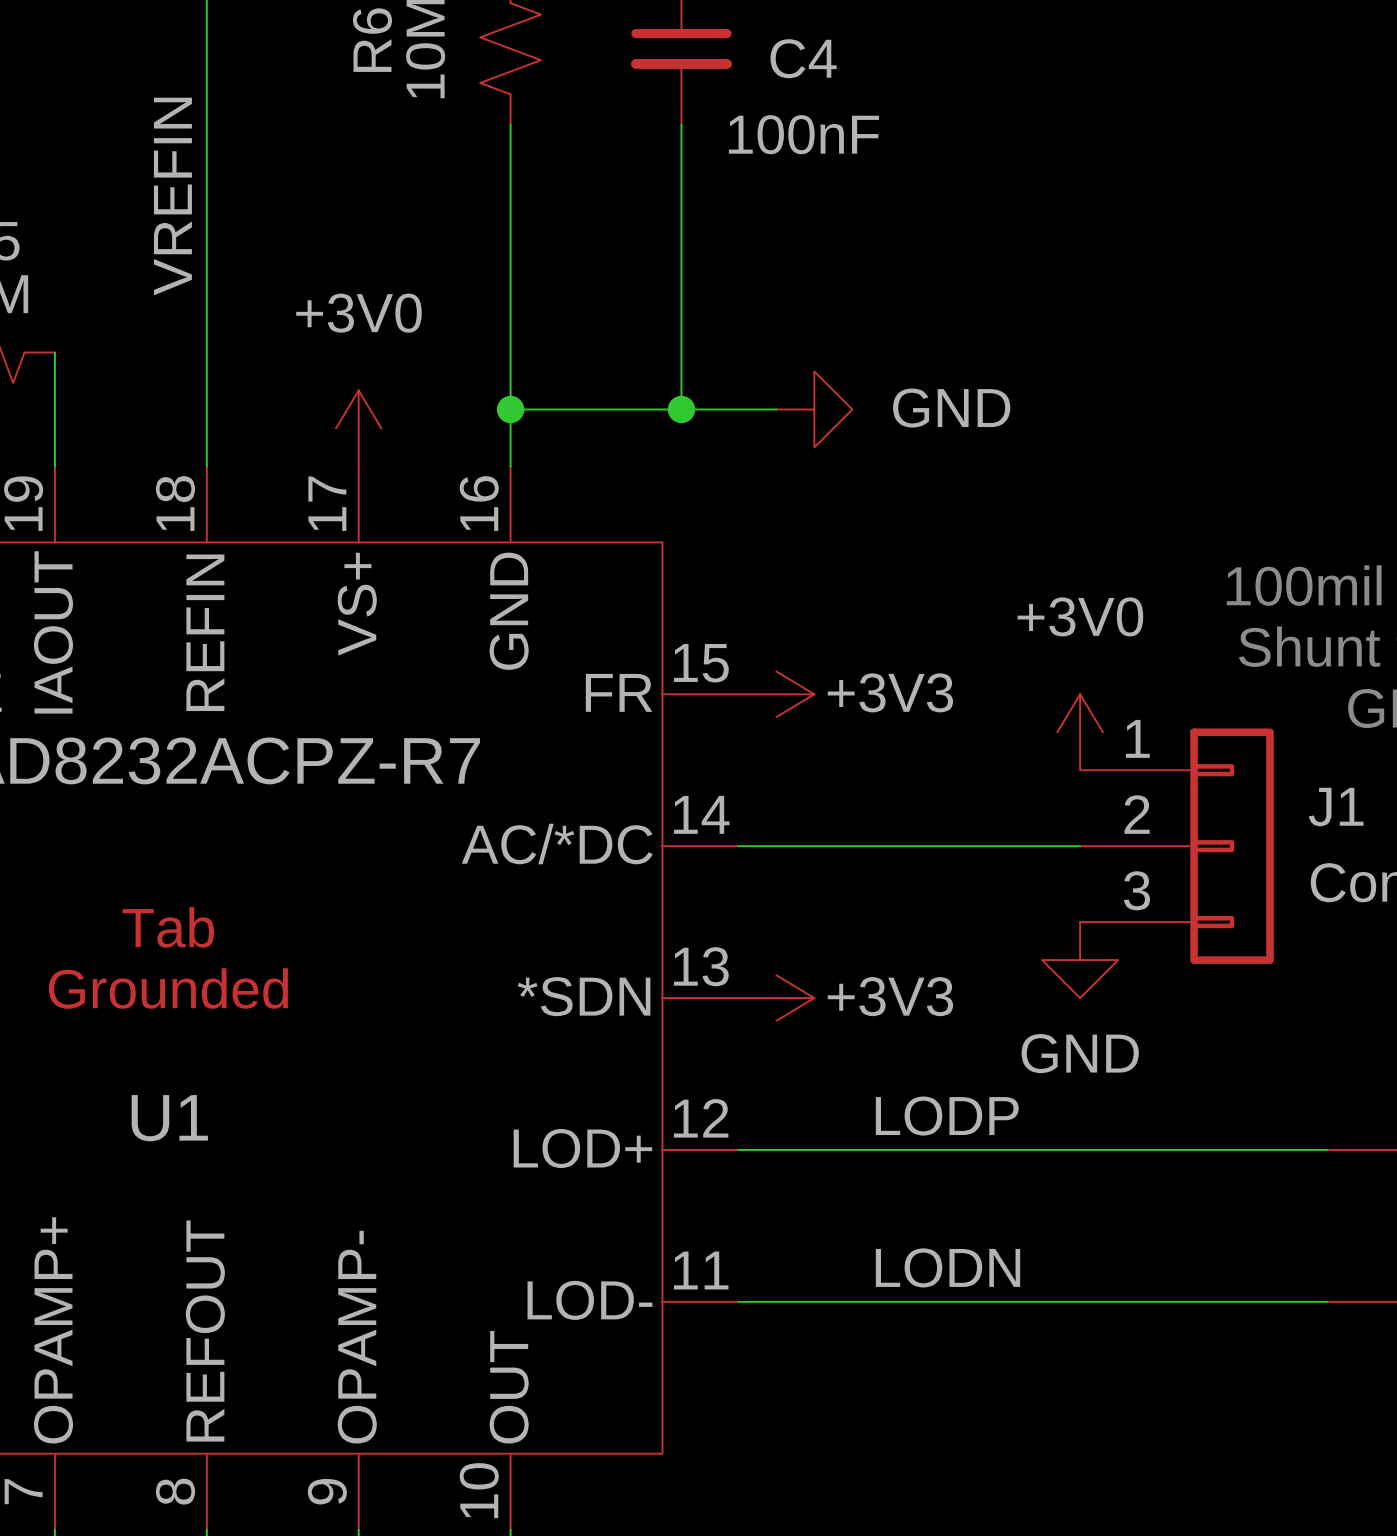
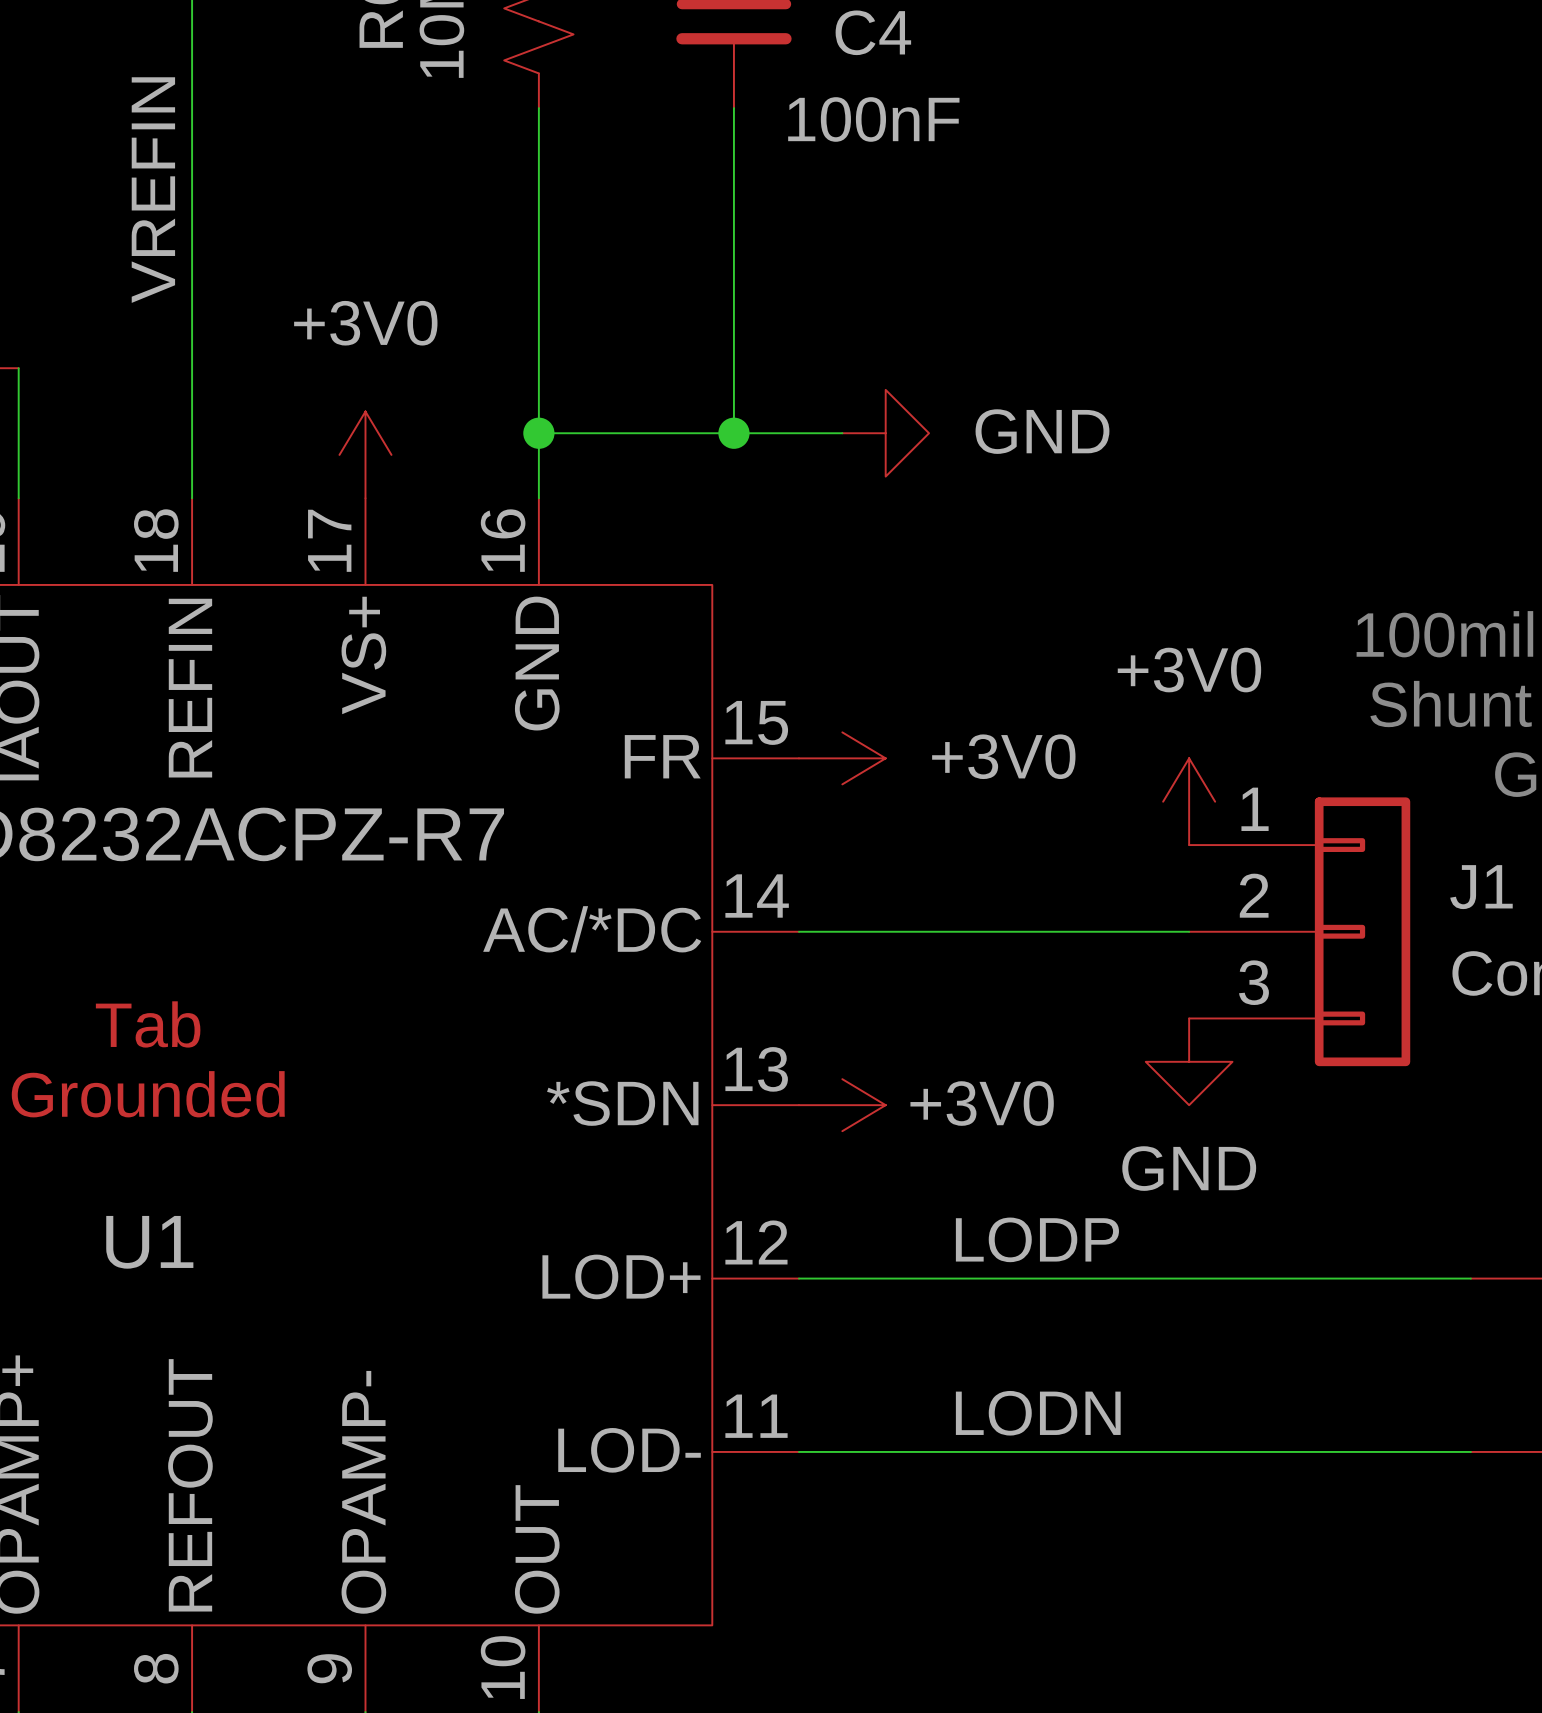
power symbol: +3V3 (776, 694) -> +3V0 (842, 758)
power symbol: +3V3 (776, 998) -> +3V0 (842, 1105)

